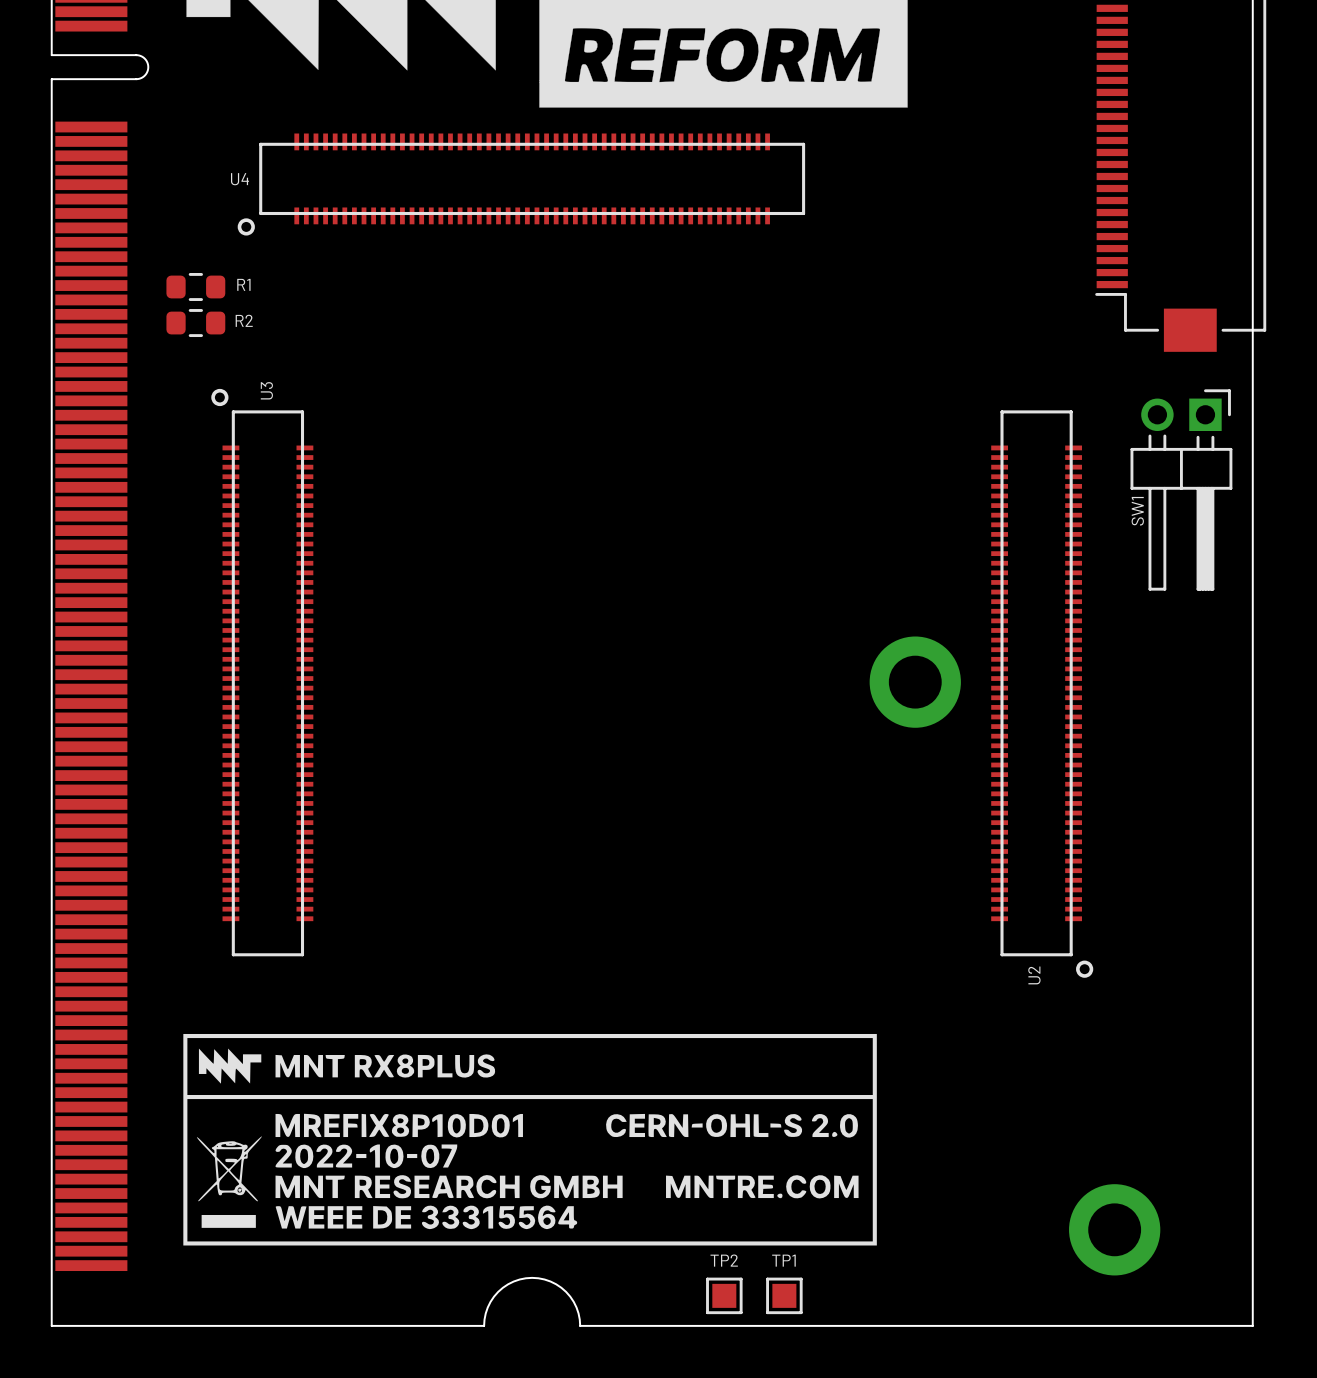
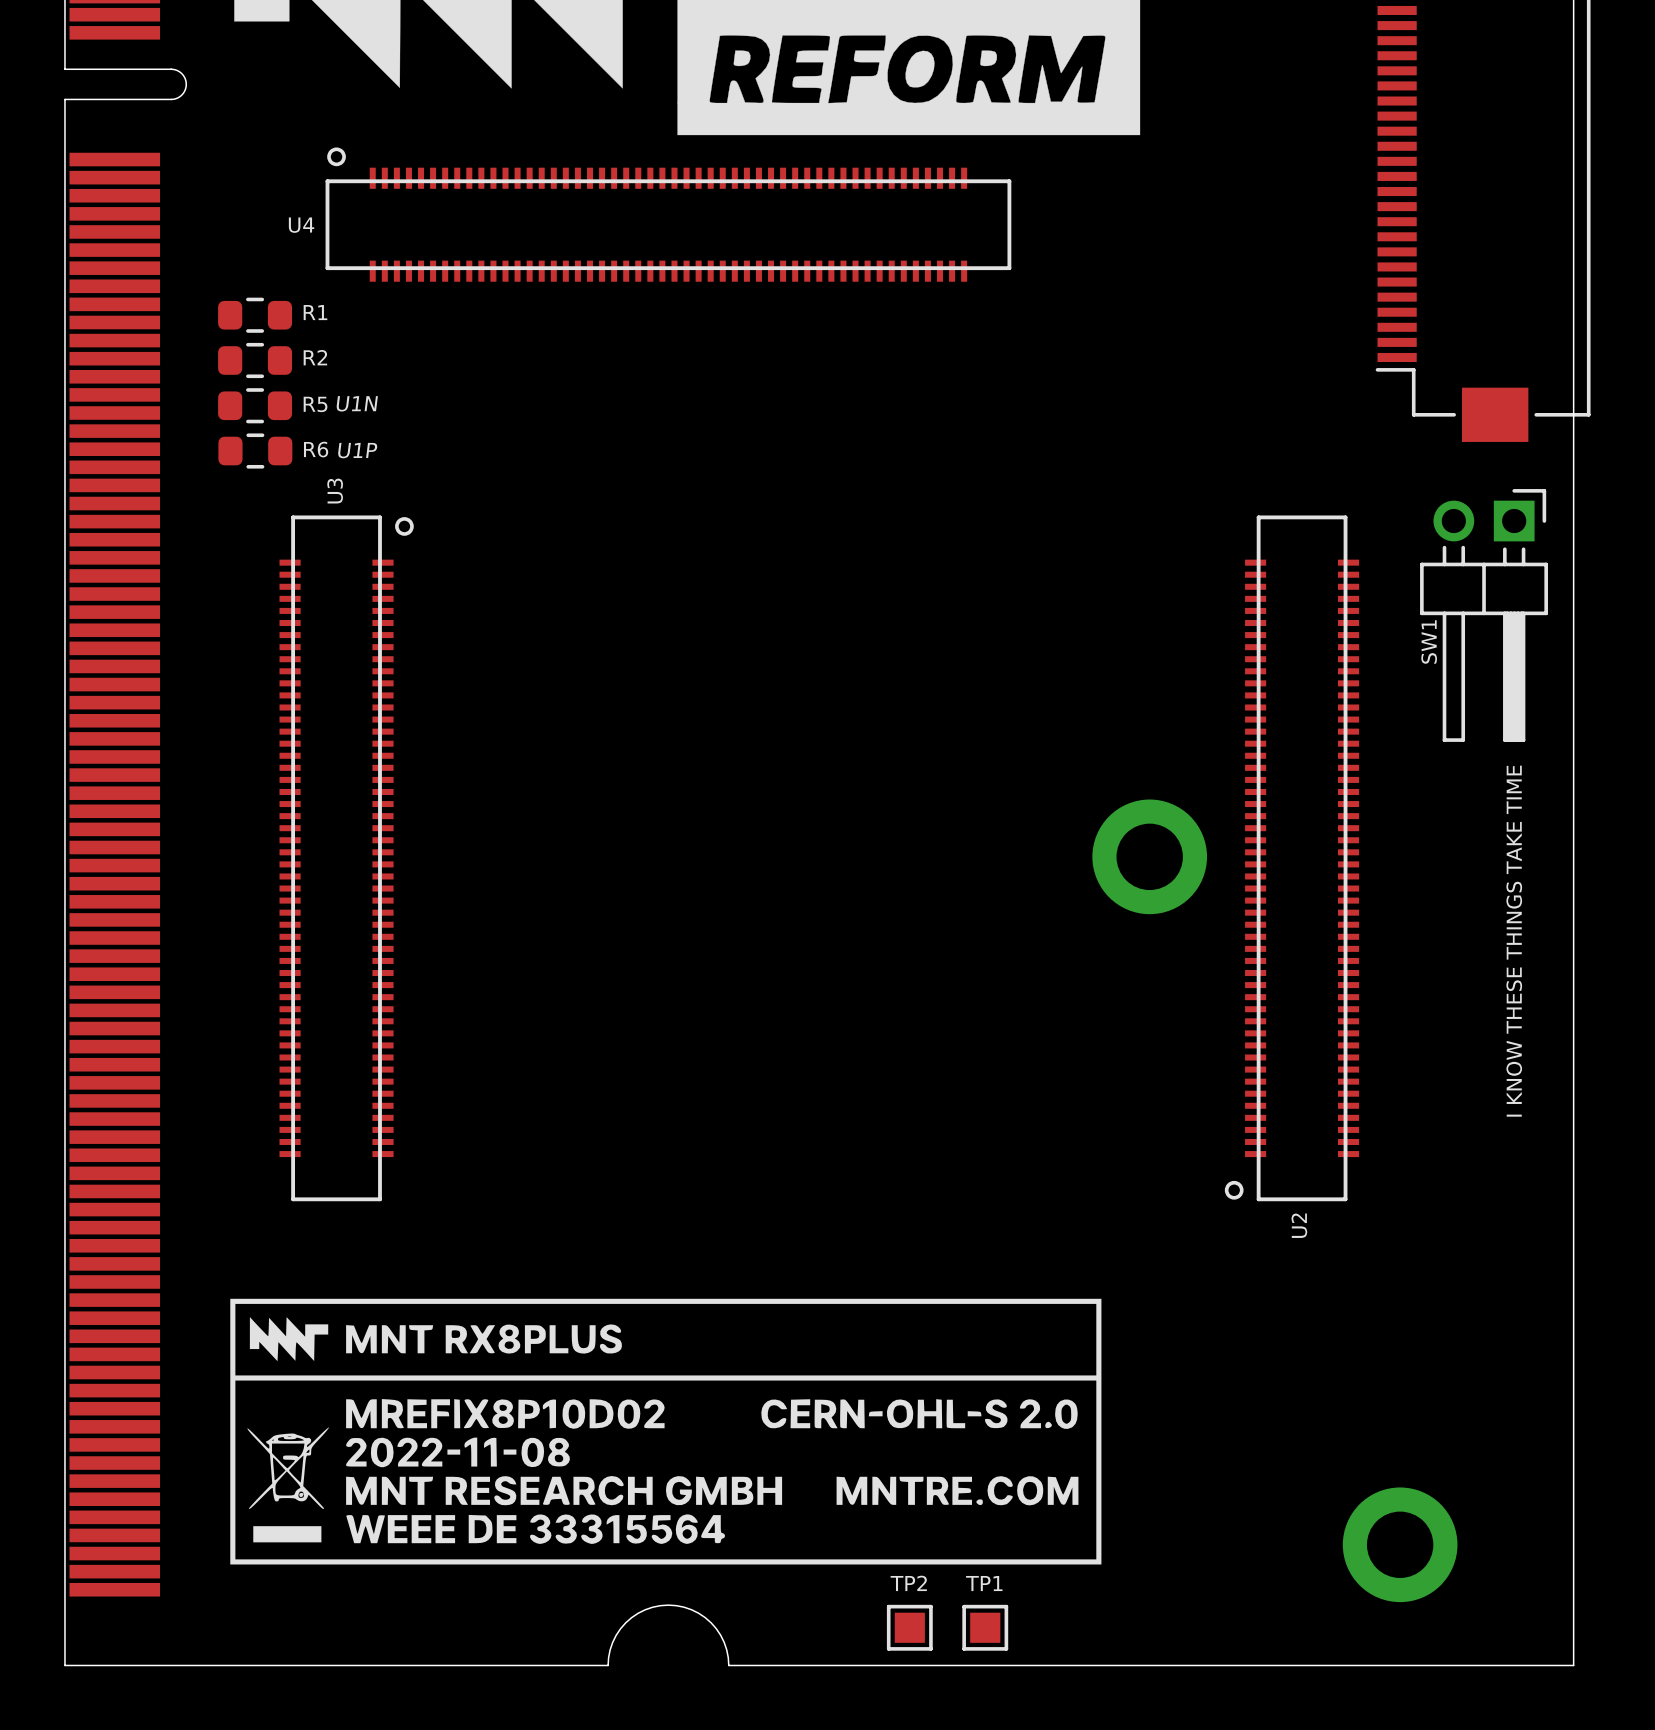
U4 footprint: [259, 133, 806, 225] -> [325, 147, 1012, 282]
drawing: [237, 218, 255, 236] -> none
R1 position: (195, 286) -> (255, 315)
text: none -> U1N (357, 403)
R2 position: (195, 323) -> (255, 360)
R5: none -> (255, 405)
text: none -> U1P (357, 450)
R6: none -> (255, 451)
drawing: [211, 388, 229, 407] -> none
U3 footprint: [222, 410, 314, 957] -> [279, 515, 414, 1202]
U2 footprint: [991, 410, 1082, 957] -> [1224, 515, 1360, 1202]
text: none -> I KNOW THESE THINGS TAKE TIME (1514, 941)
drawing: [1076, 960, 1094, 978] -> none
drawing shape: [183, 1033, 877, 1246] -> [230, 1298, 1102, 1565]

